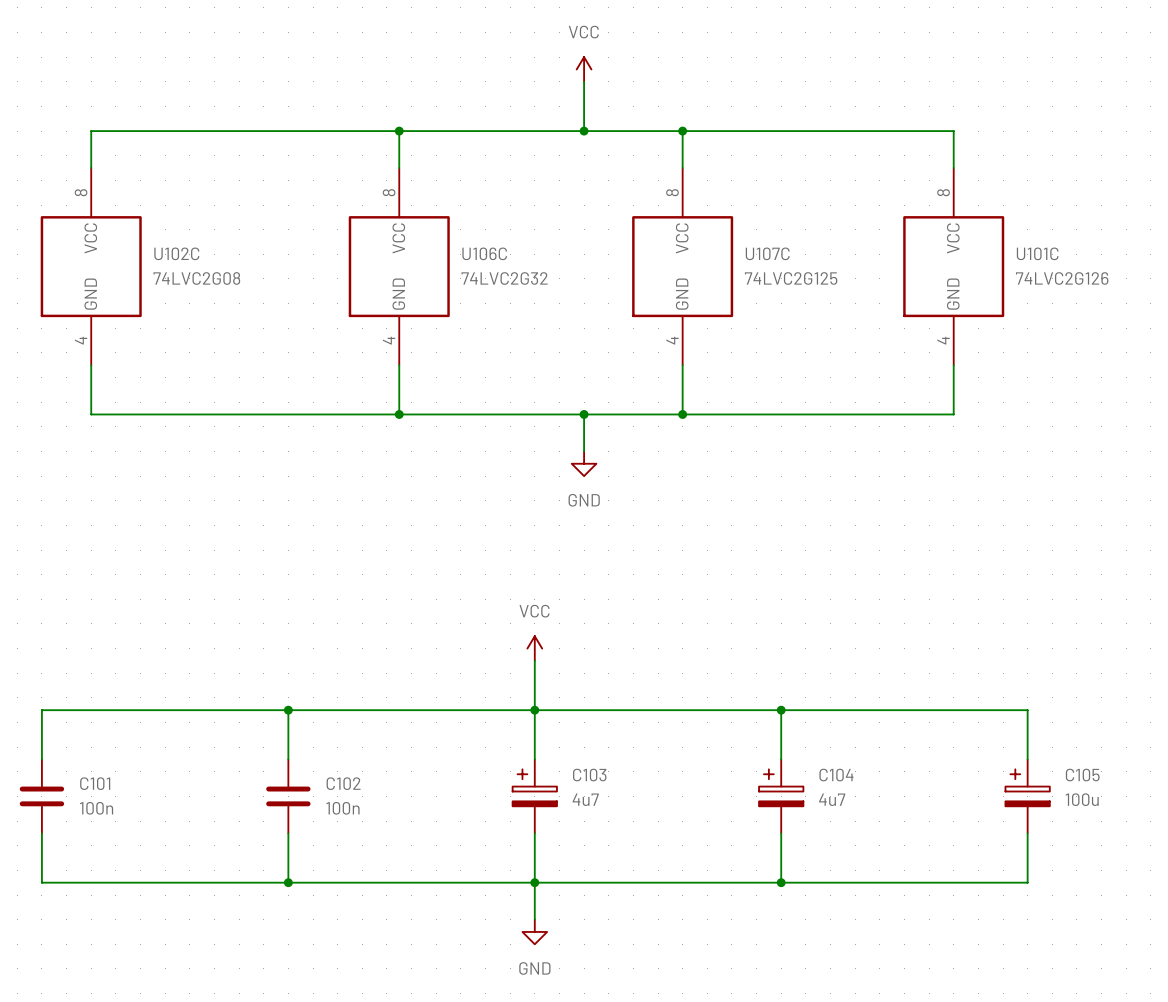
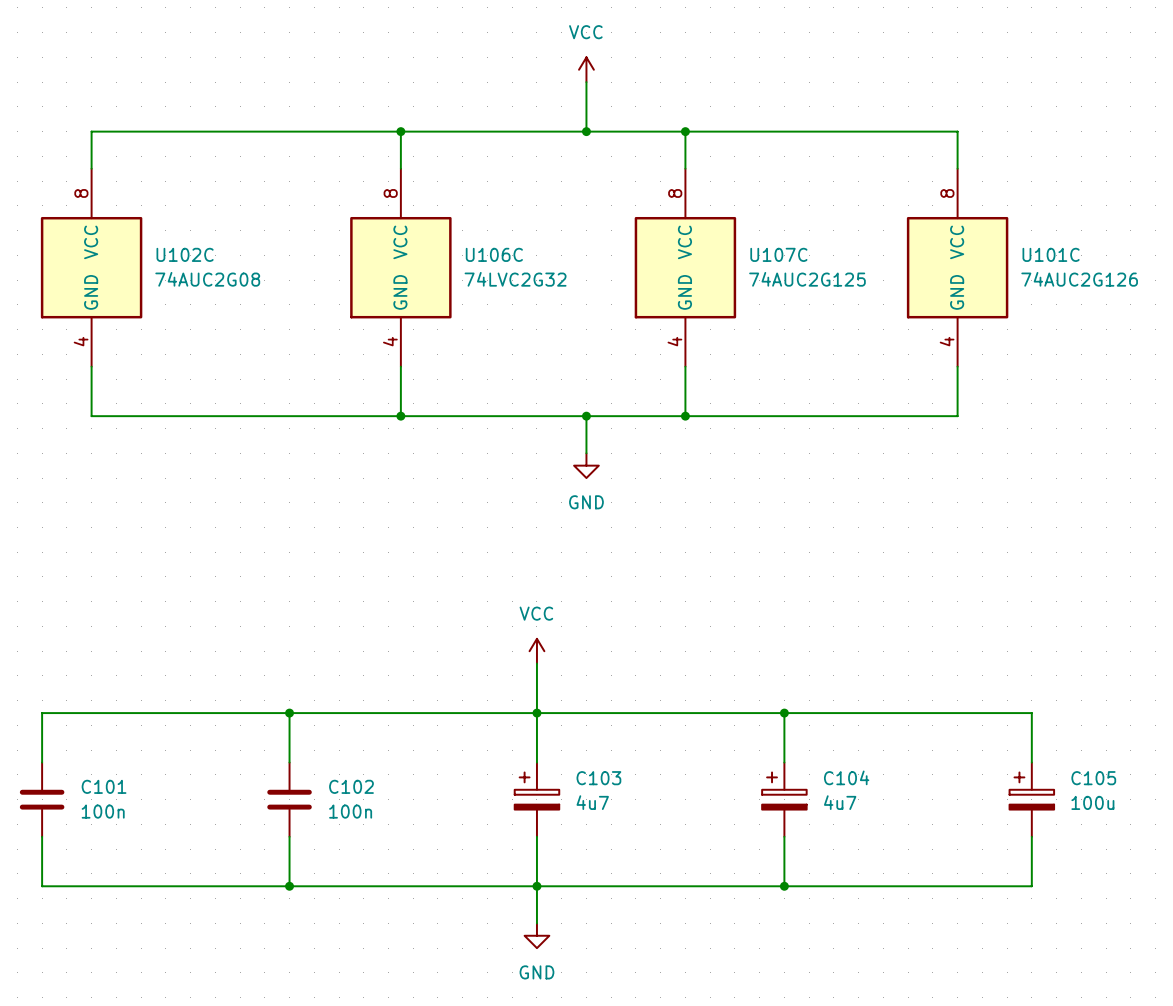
U102C value: 74LVC2G08 (196, 278) -> 74AUC2G08 (207, 279)
U107C value: 74LVC2G125 (791, 278) -> 74AUC2G125 (807, 279)
U101C value: 74LVC2G126 (1062, 278) -> 74AUC2G126 (1079, 279)

